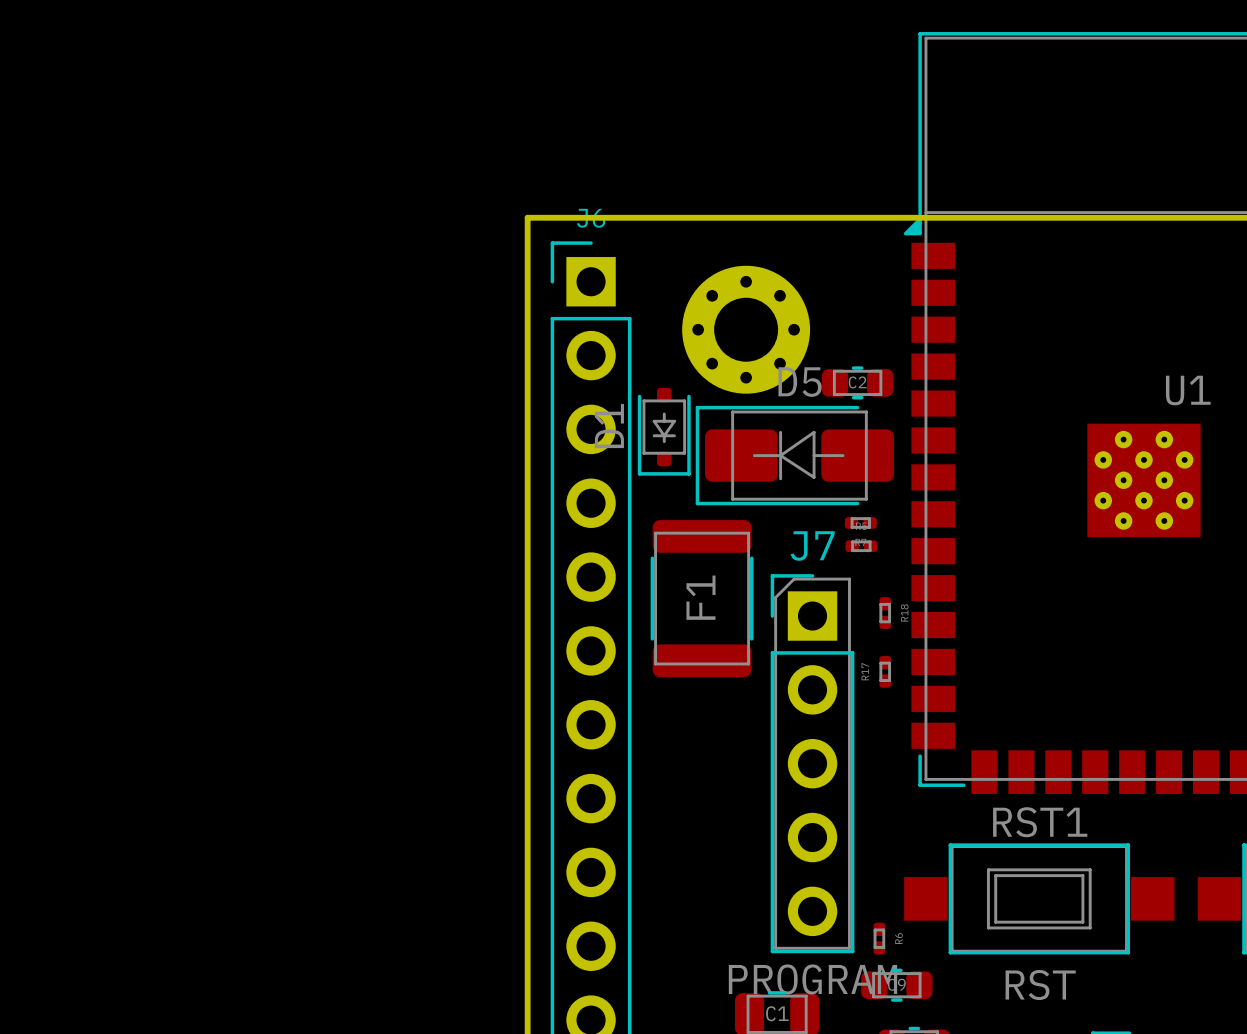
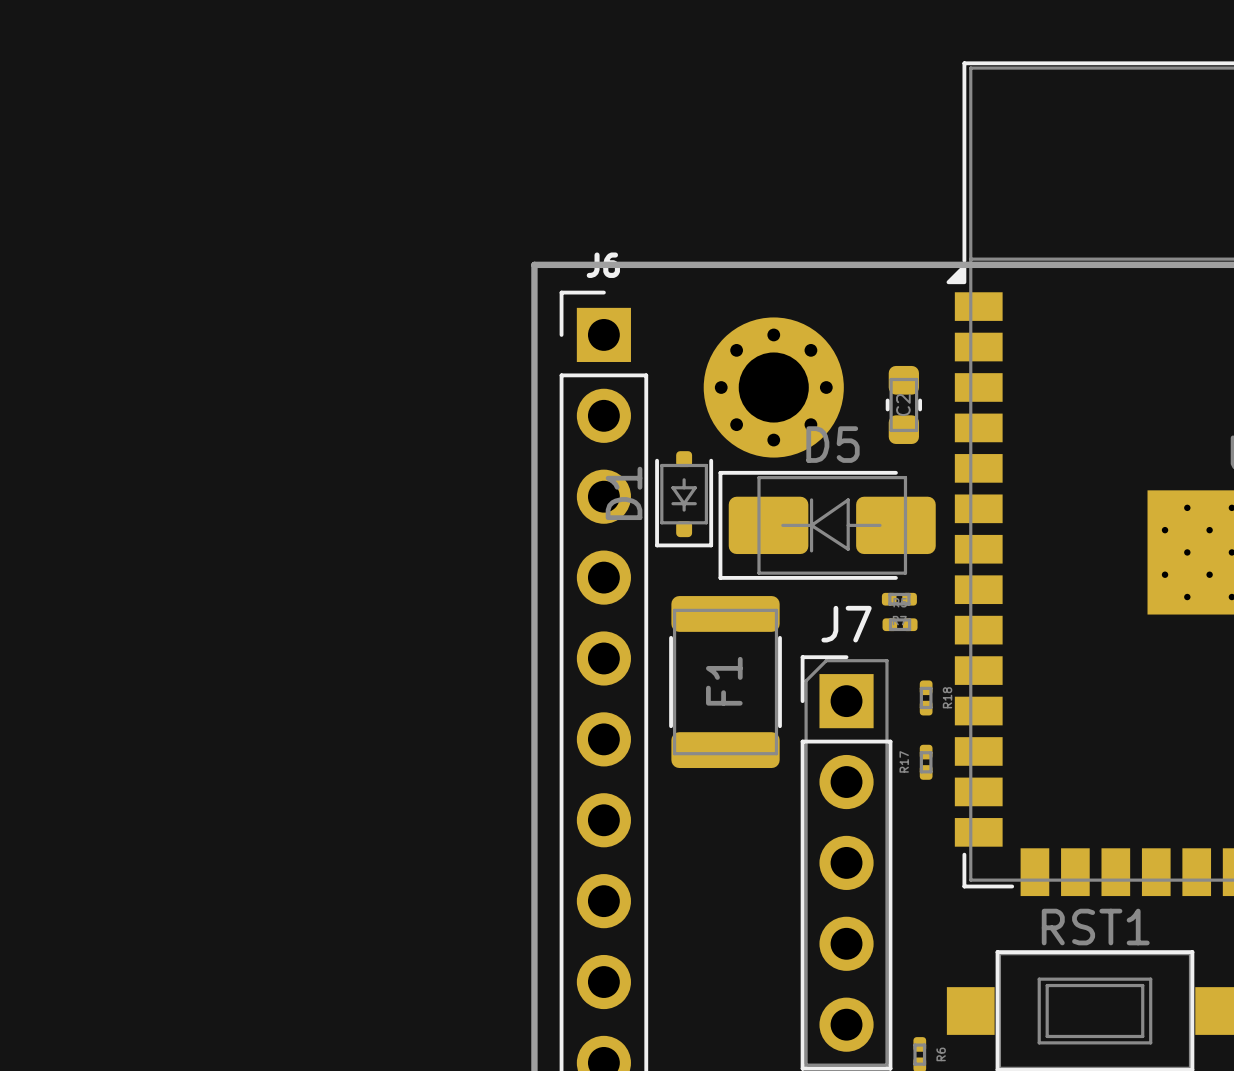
C2 rotation: 0° (857, 382) -> 90° clockwise (903, 404)

